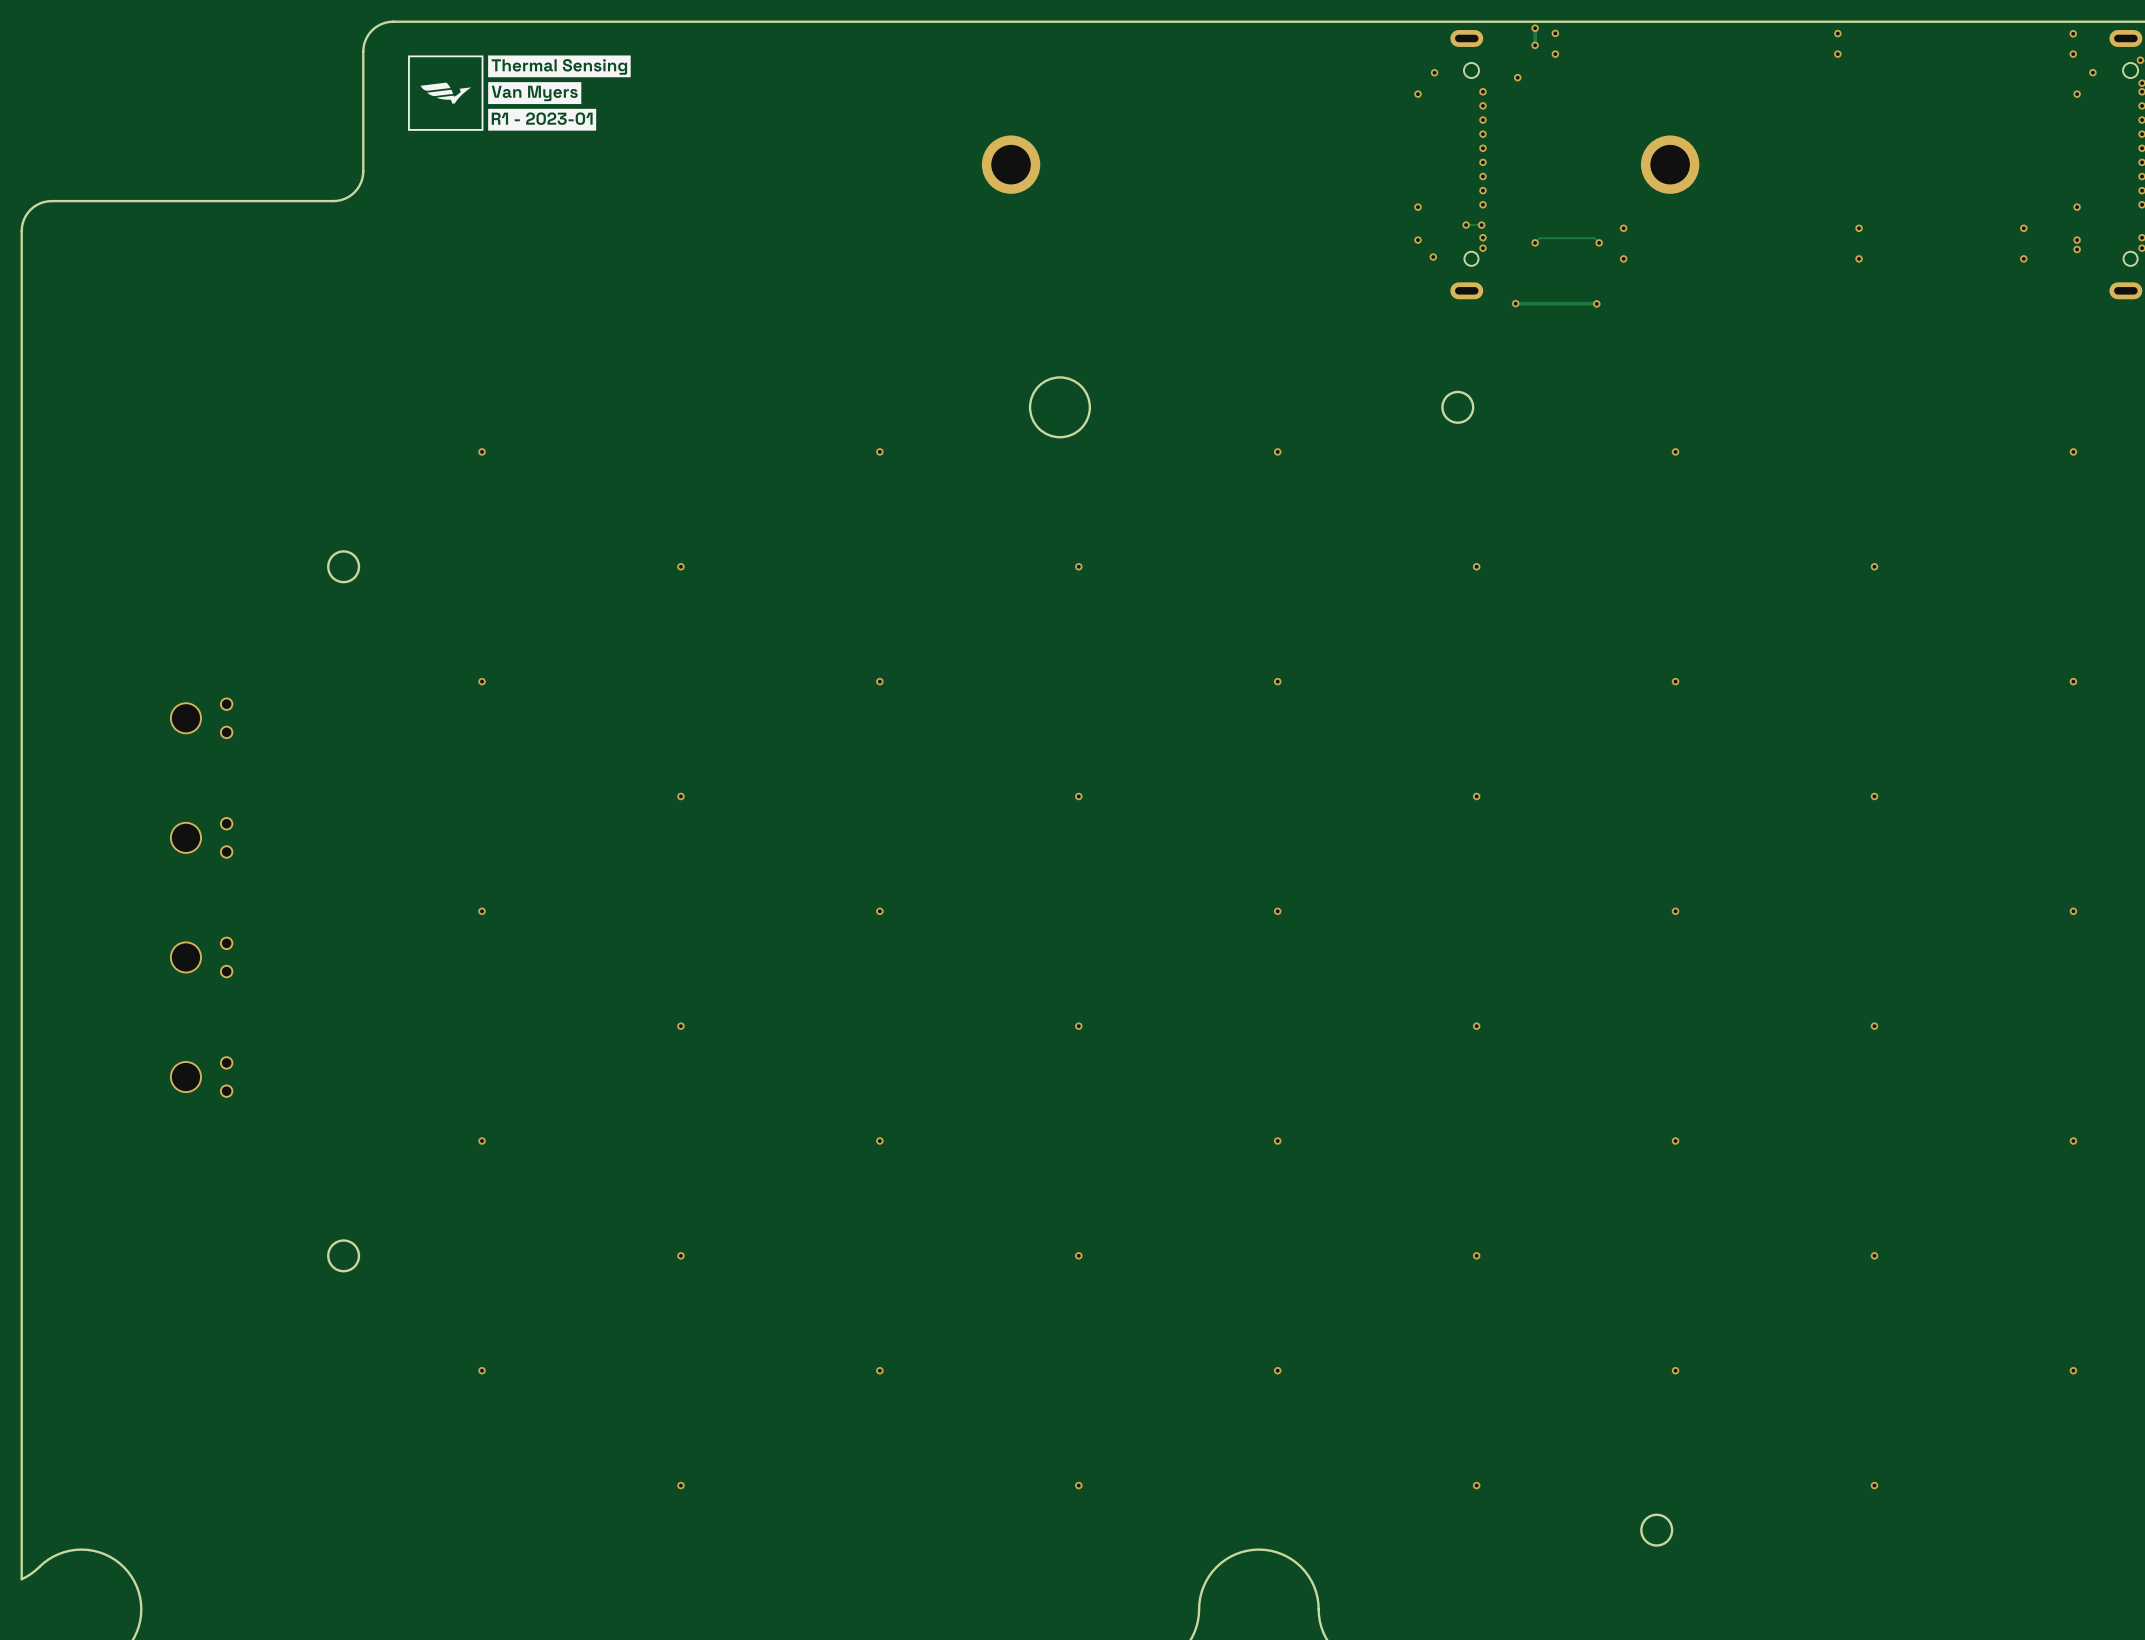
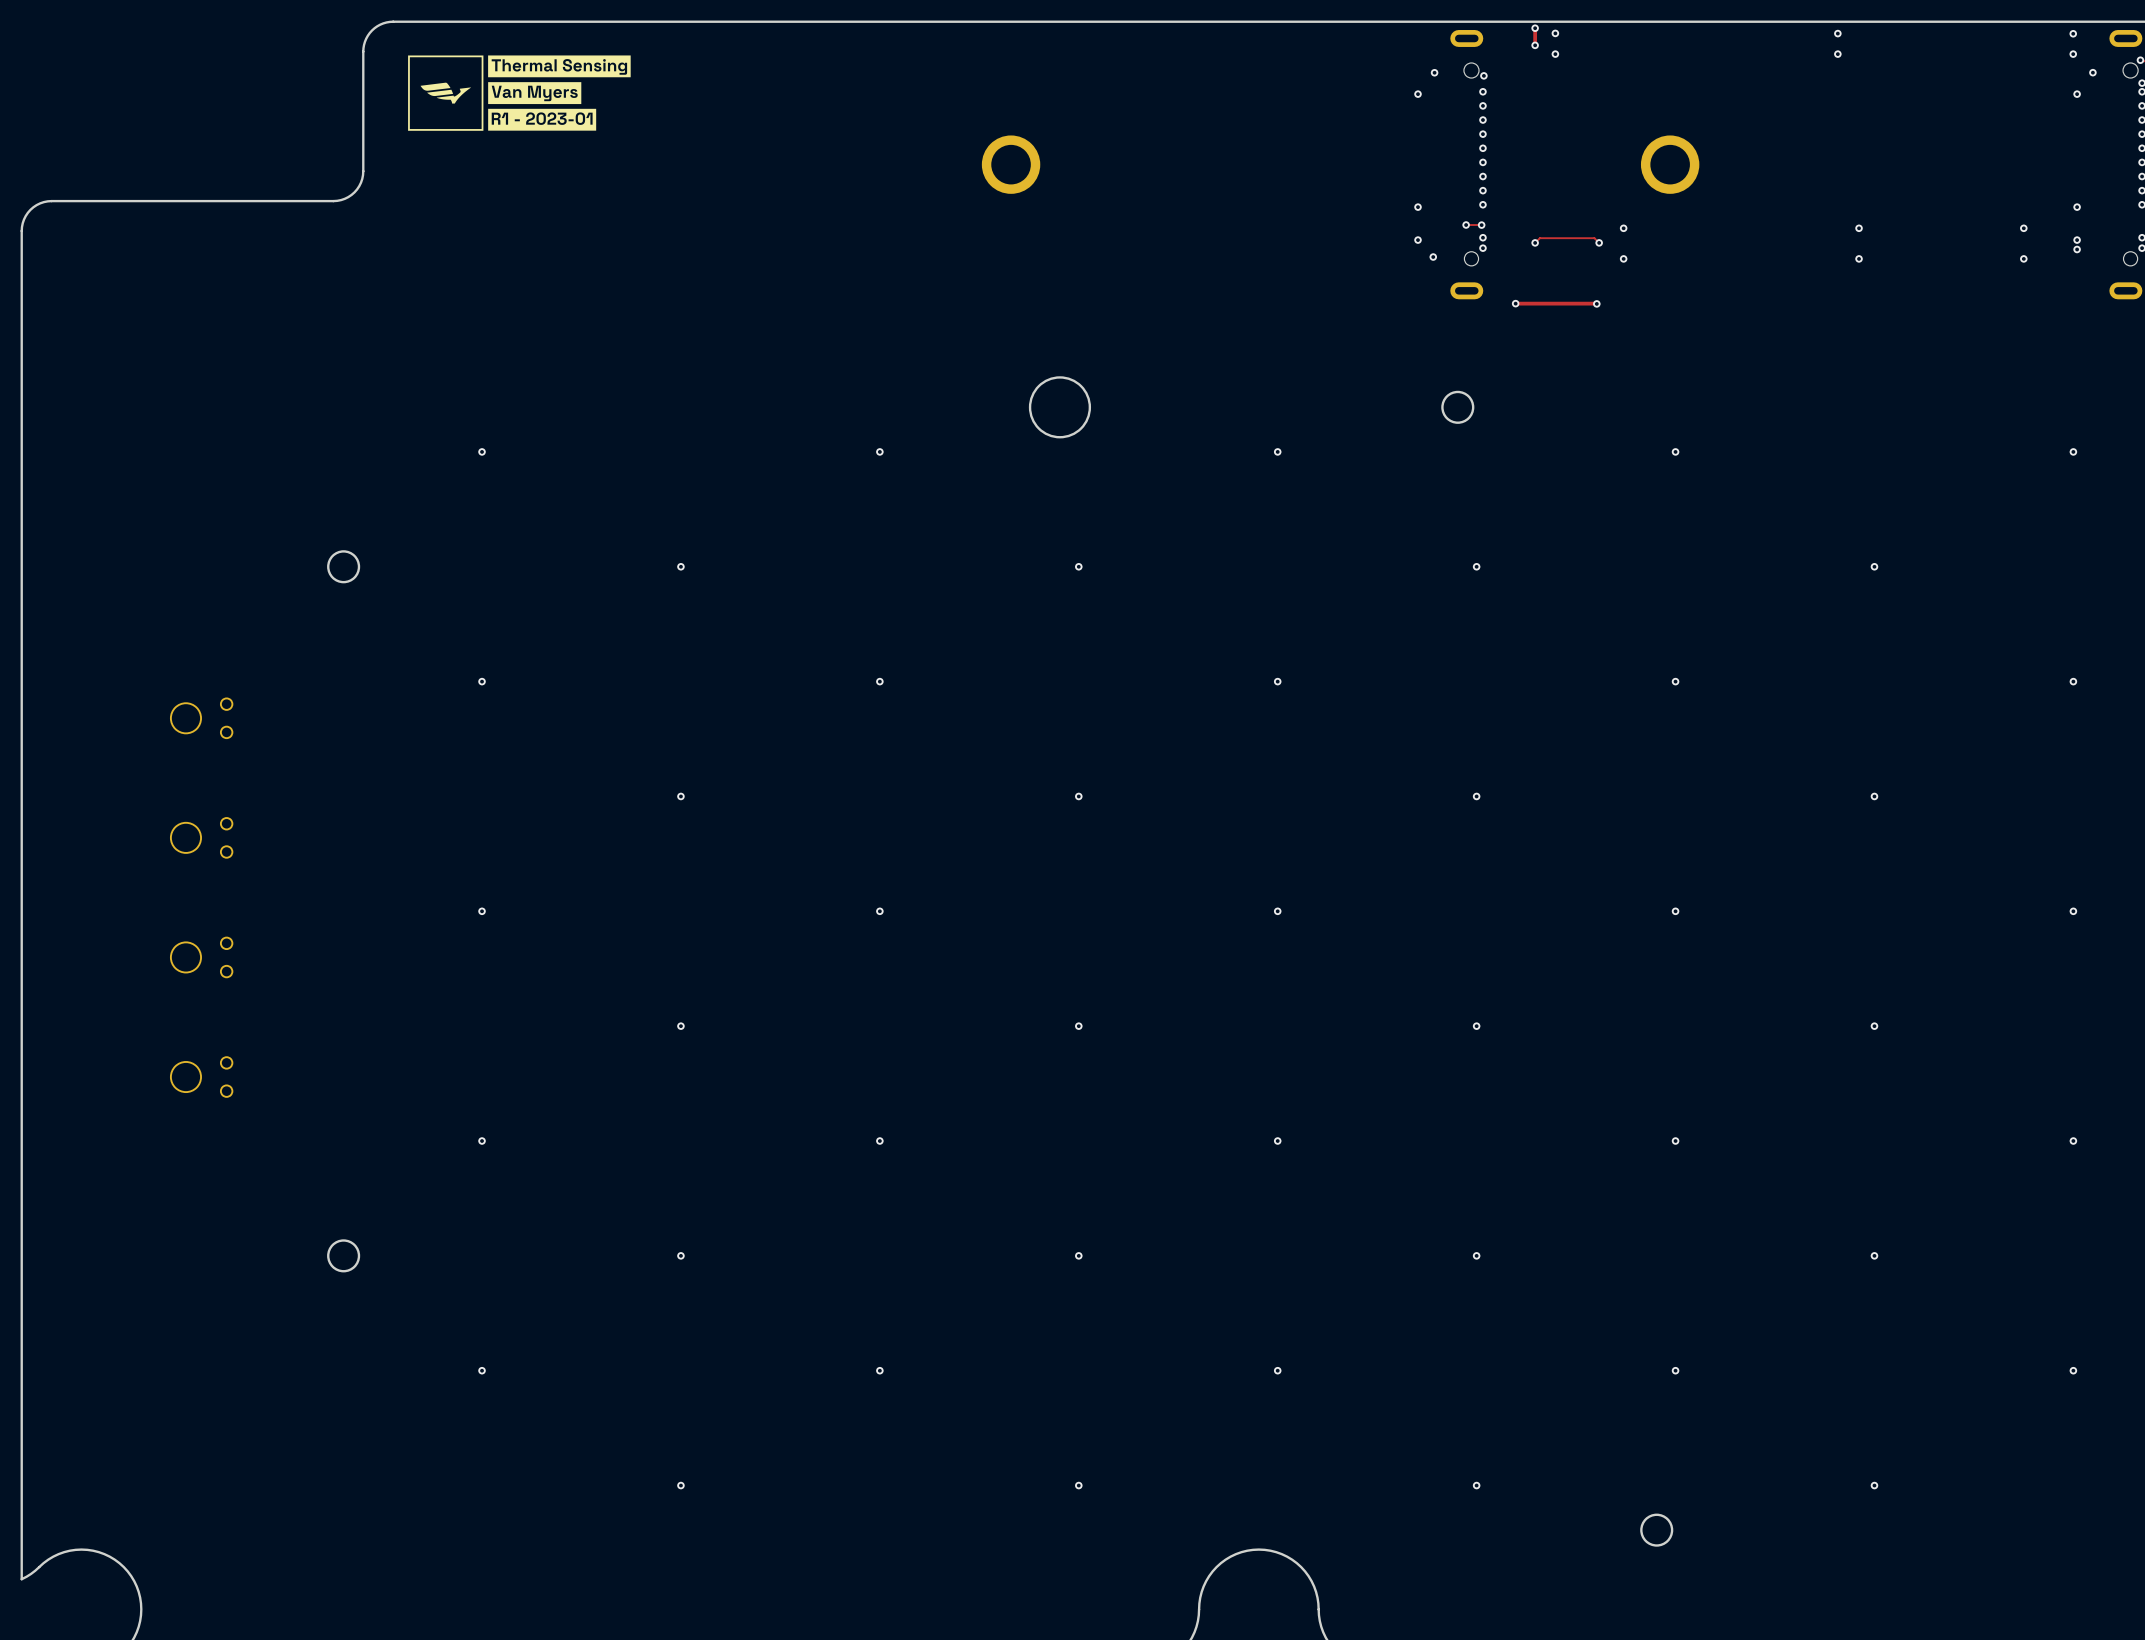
via position: (1517, 77) -> (1483, 75)

